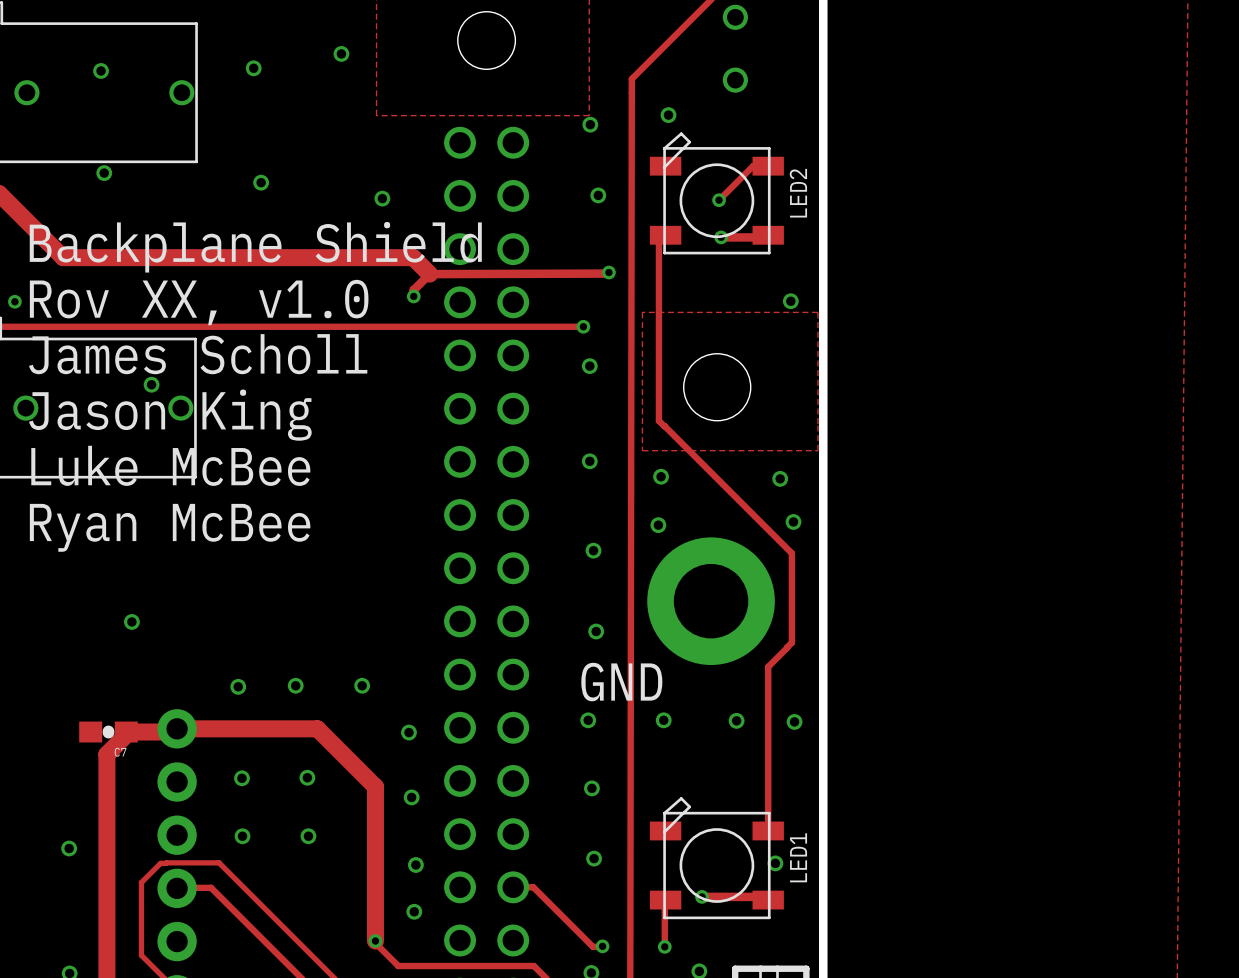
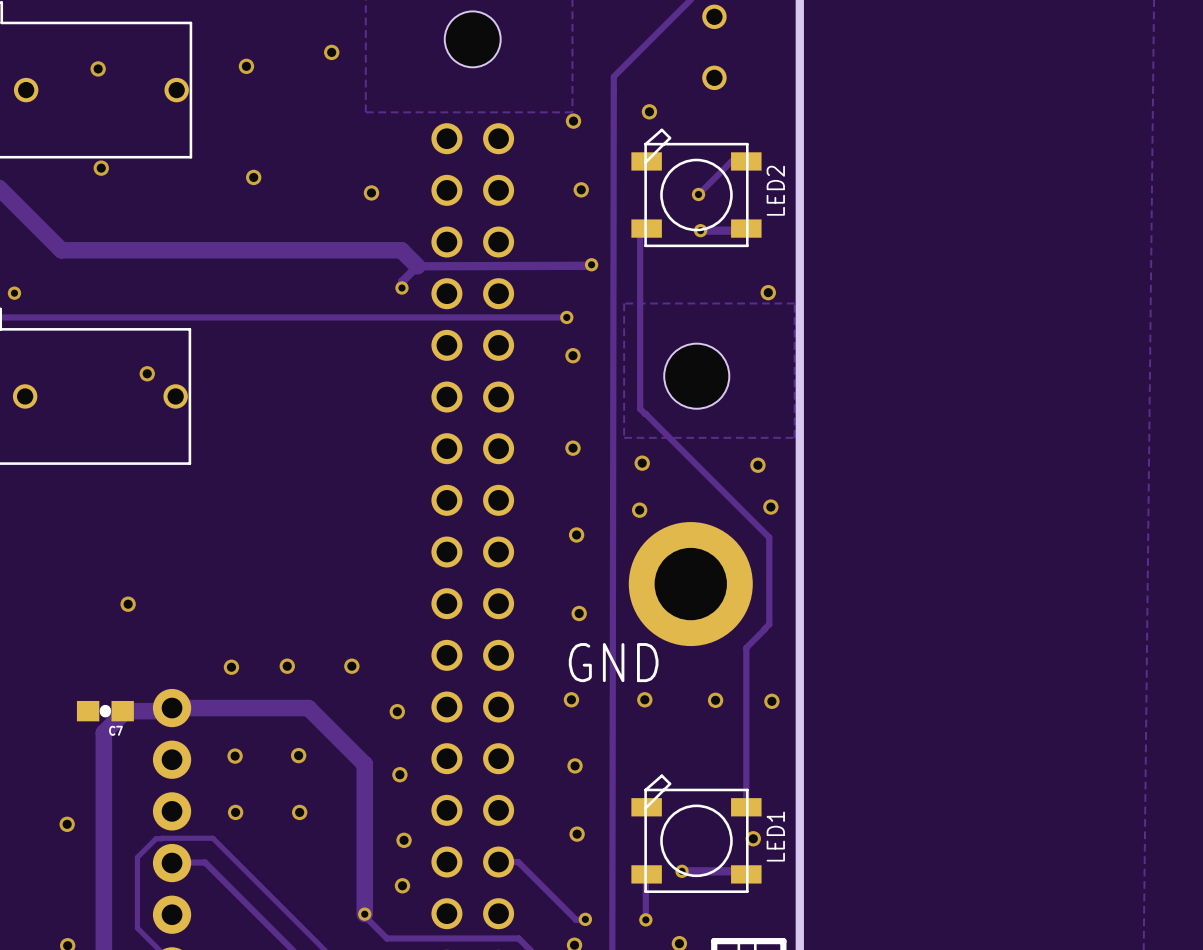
text: Backplane Shield (255, 247) -> none
text: Rov XX, v1.0 (199, 302) -> none
text: James Scholl (198, 354) -> none
text: Jason King (170, 415) -> none
text: Luke McBee (170, 465) -> none
text: Ryan McBee (170, 527) -> none

